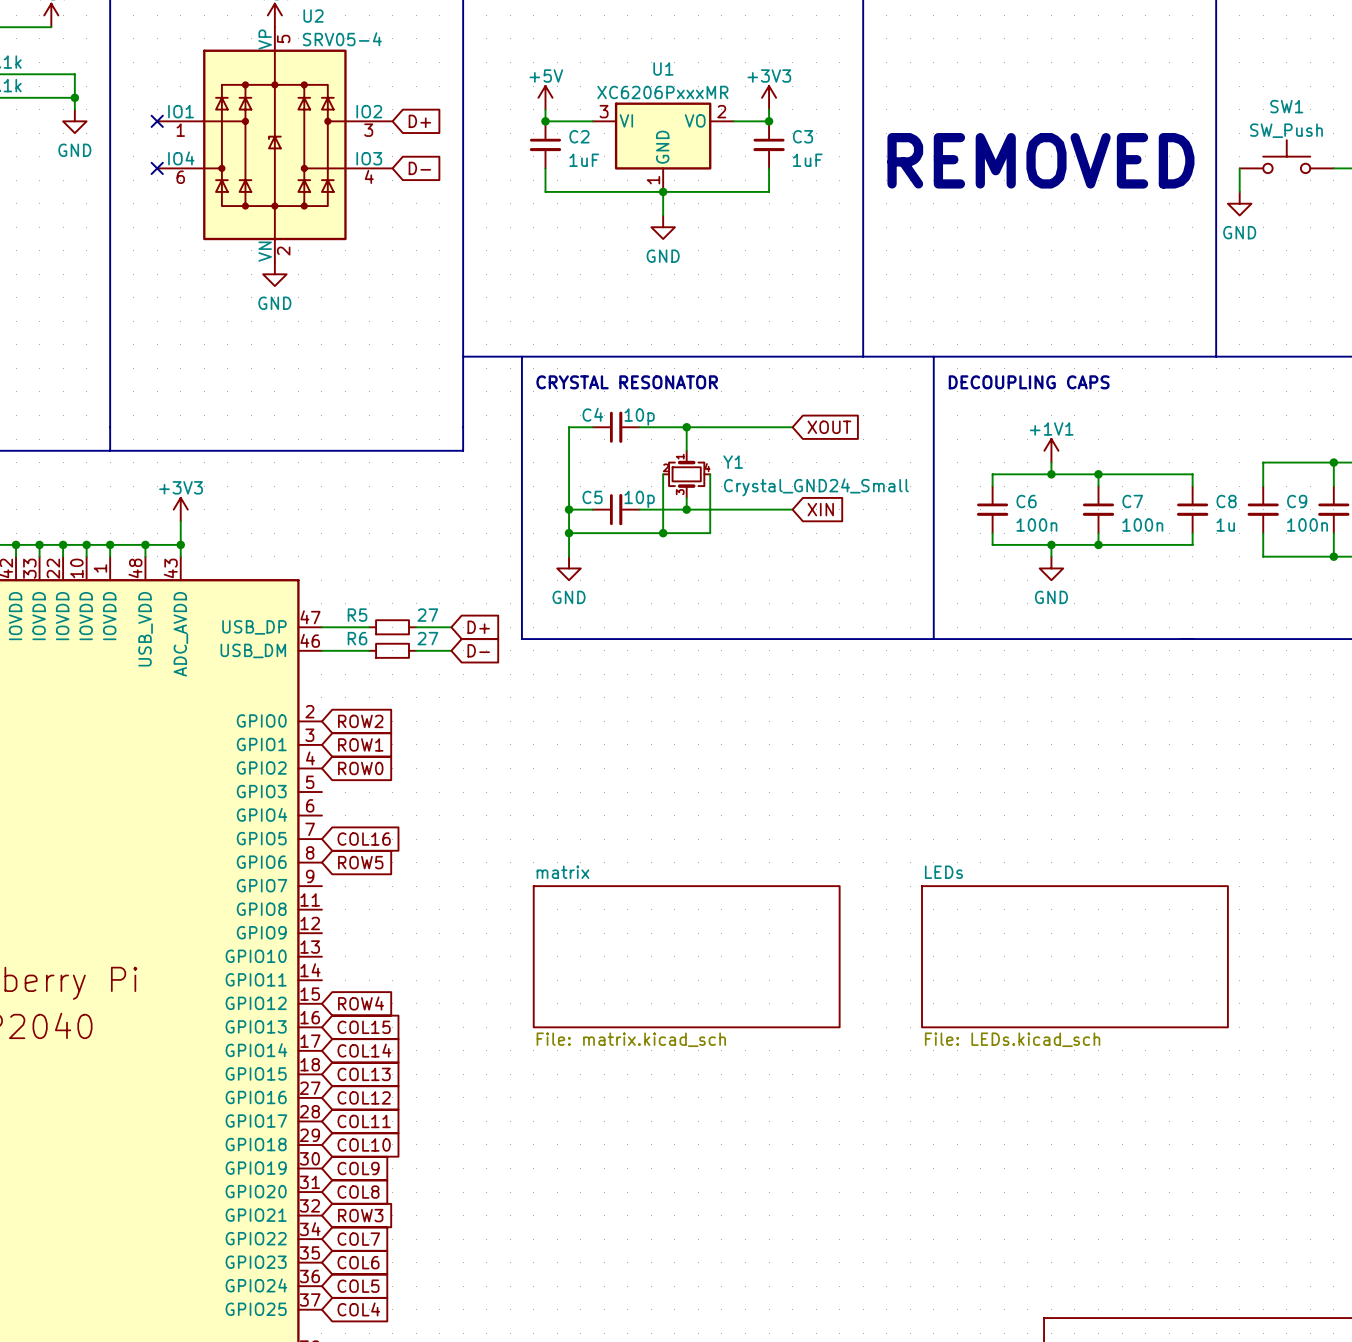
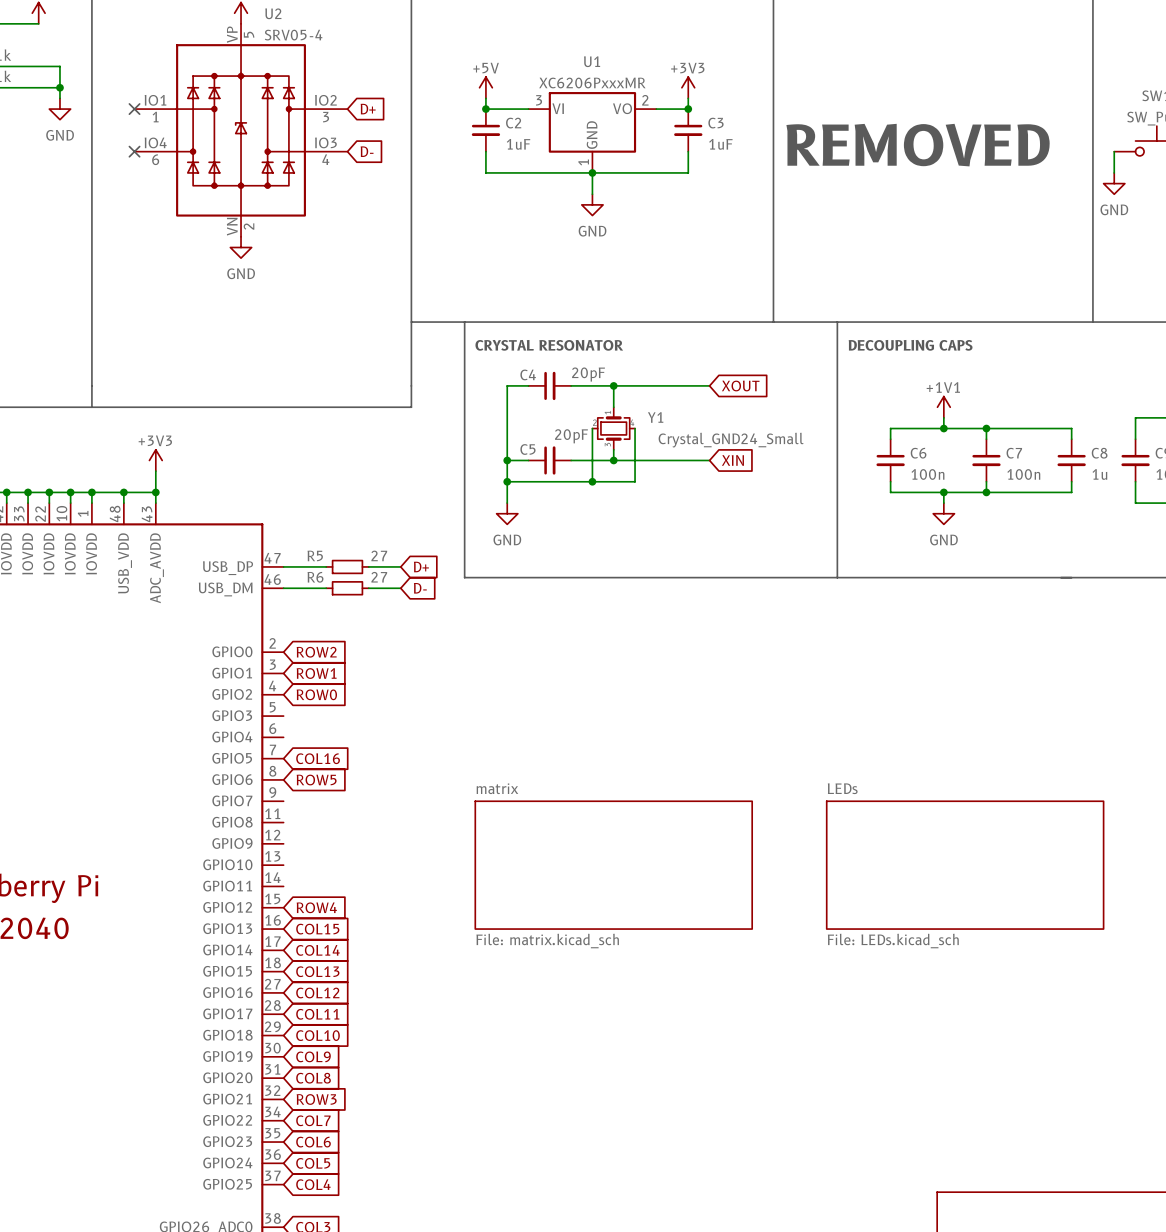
C4 value: 10p (639, 417) -> 20pF (588, 374)
C5 value: 10p (639, 499) -> 20pF (571, 436)

